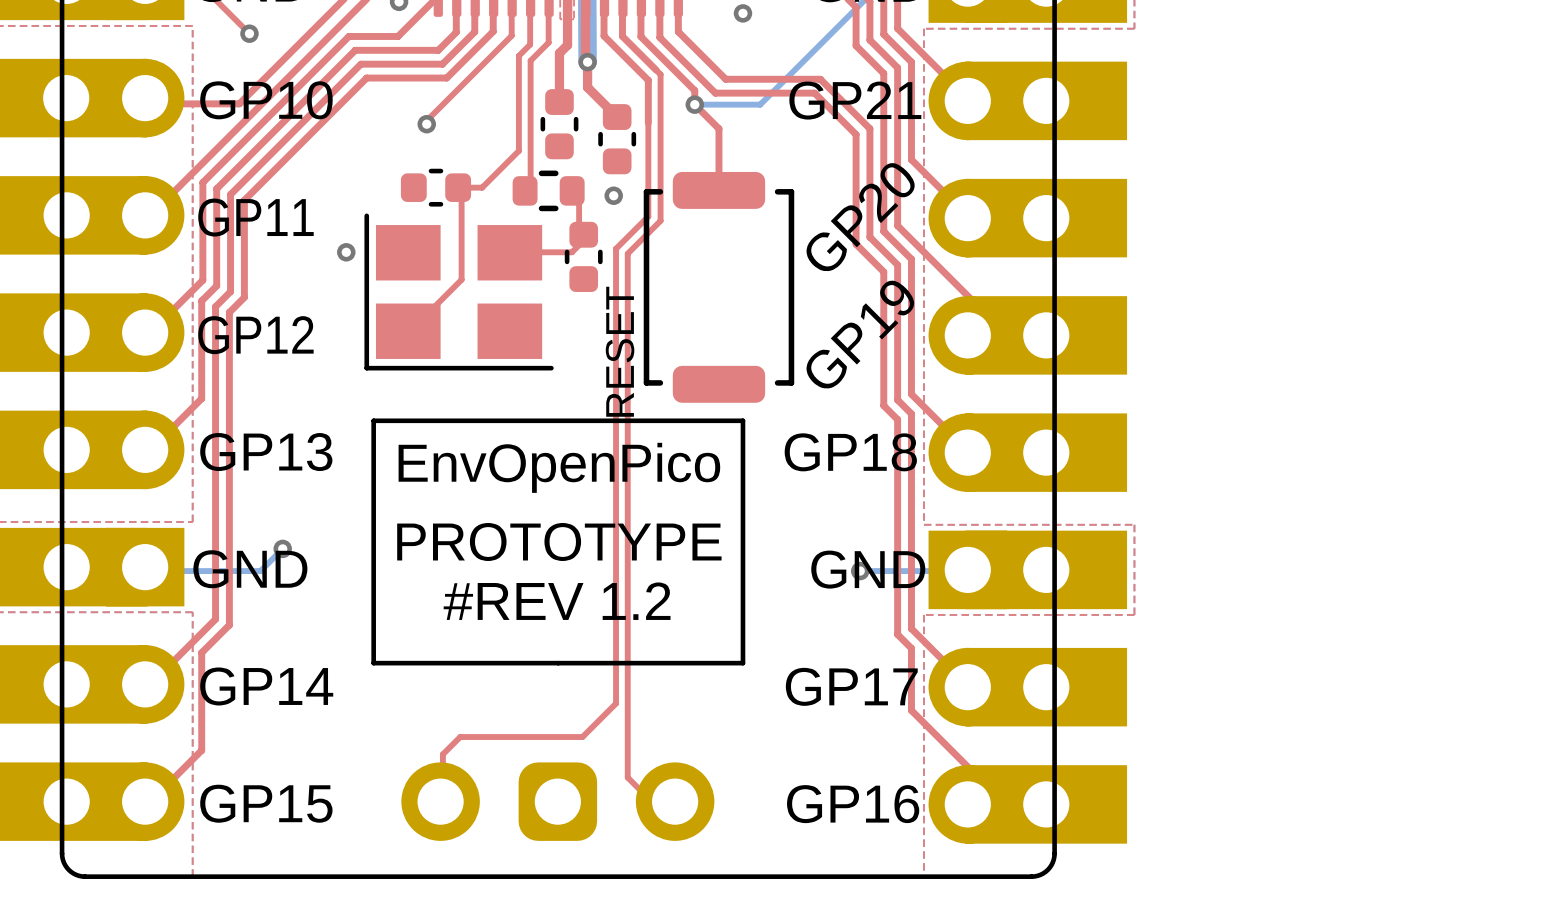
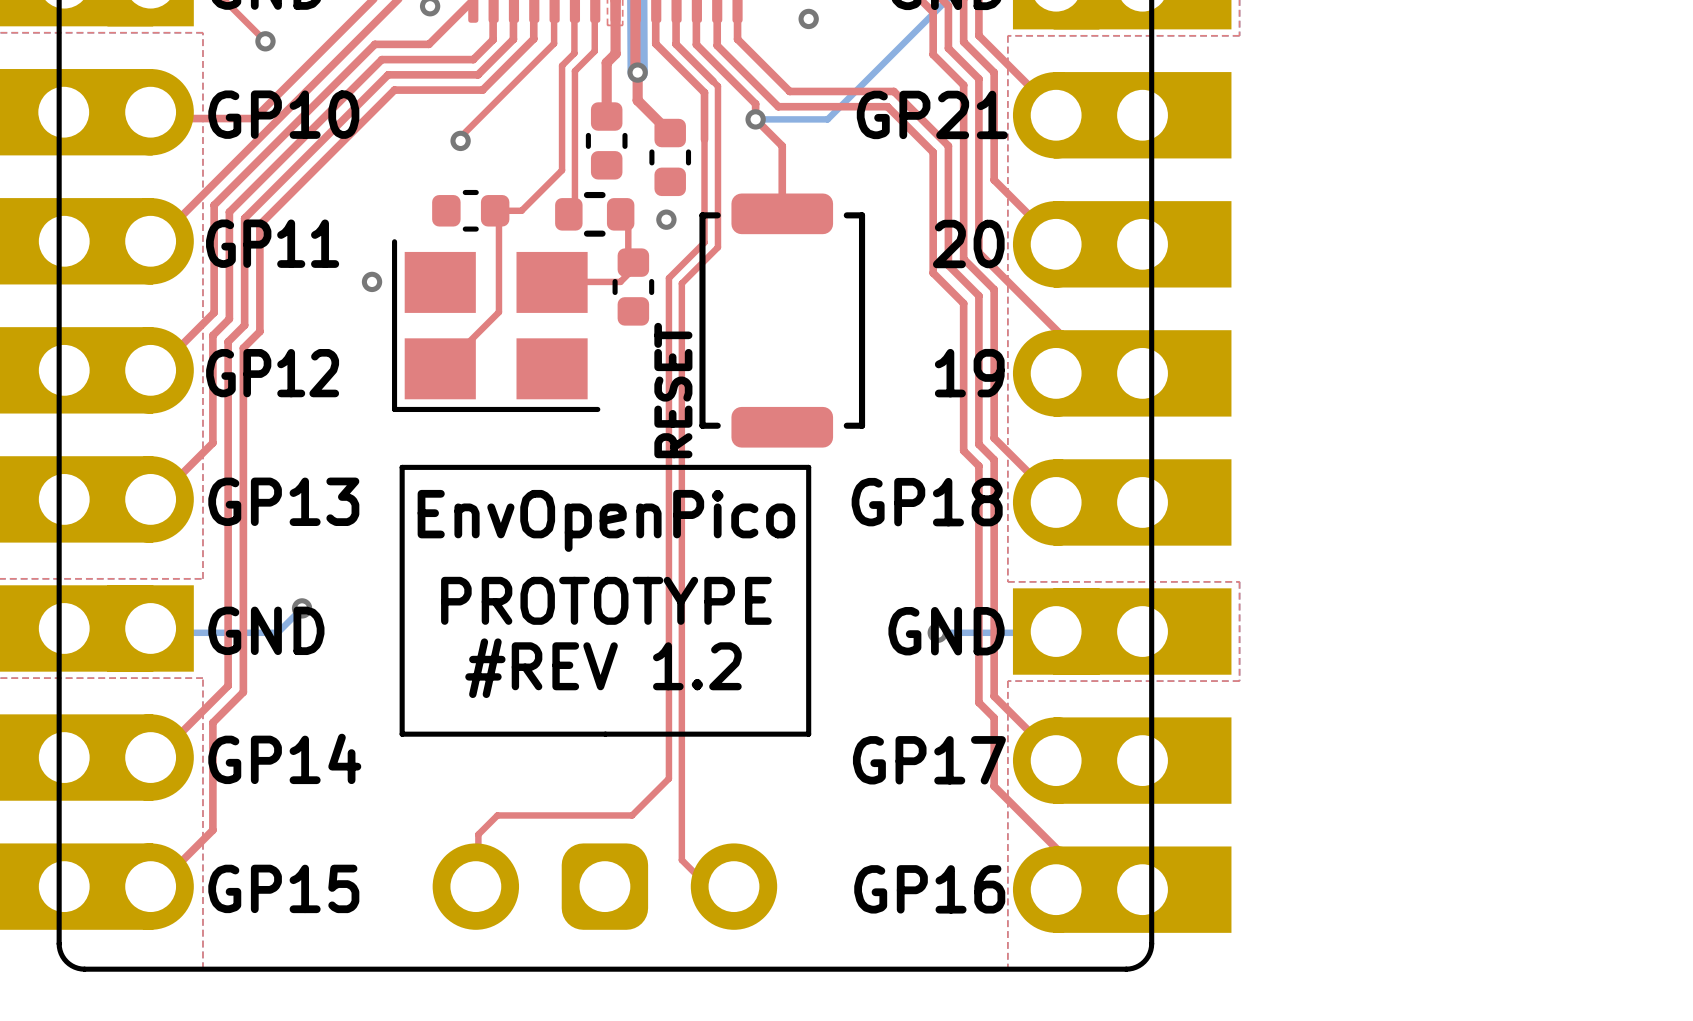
text: GP20 (861, 217) -> 20 (968, 244)
text: GP19 (860, 334) -> 19 (969, 373)

